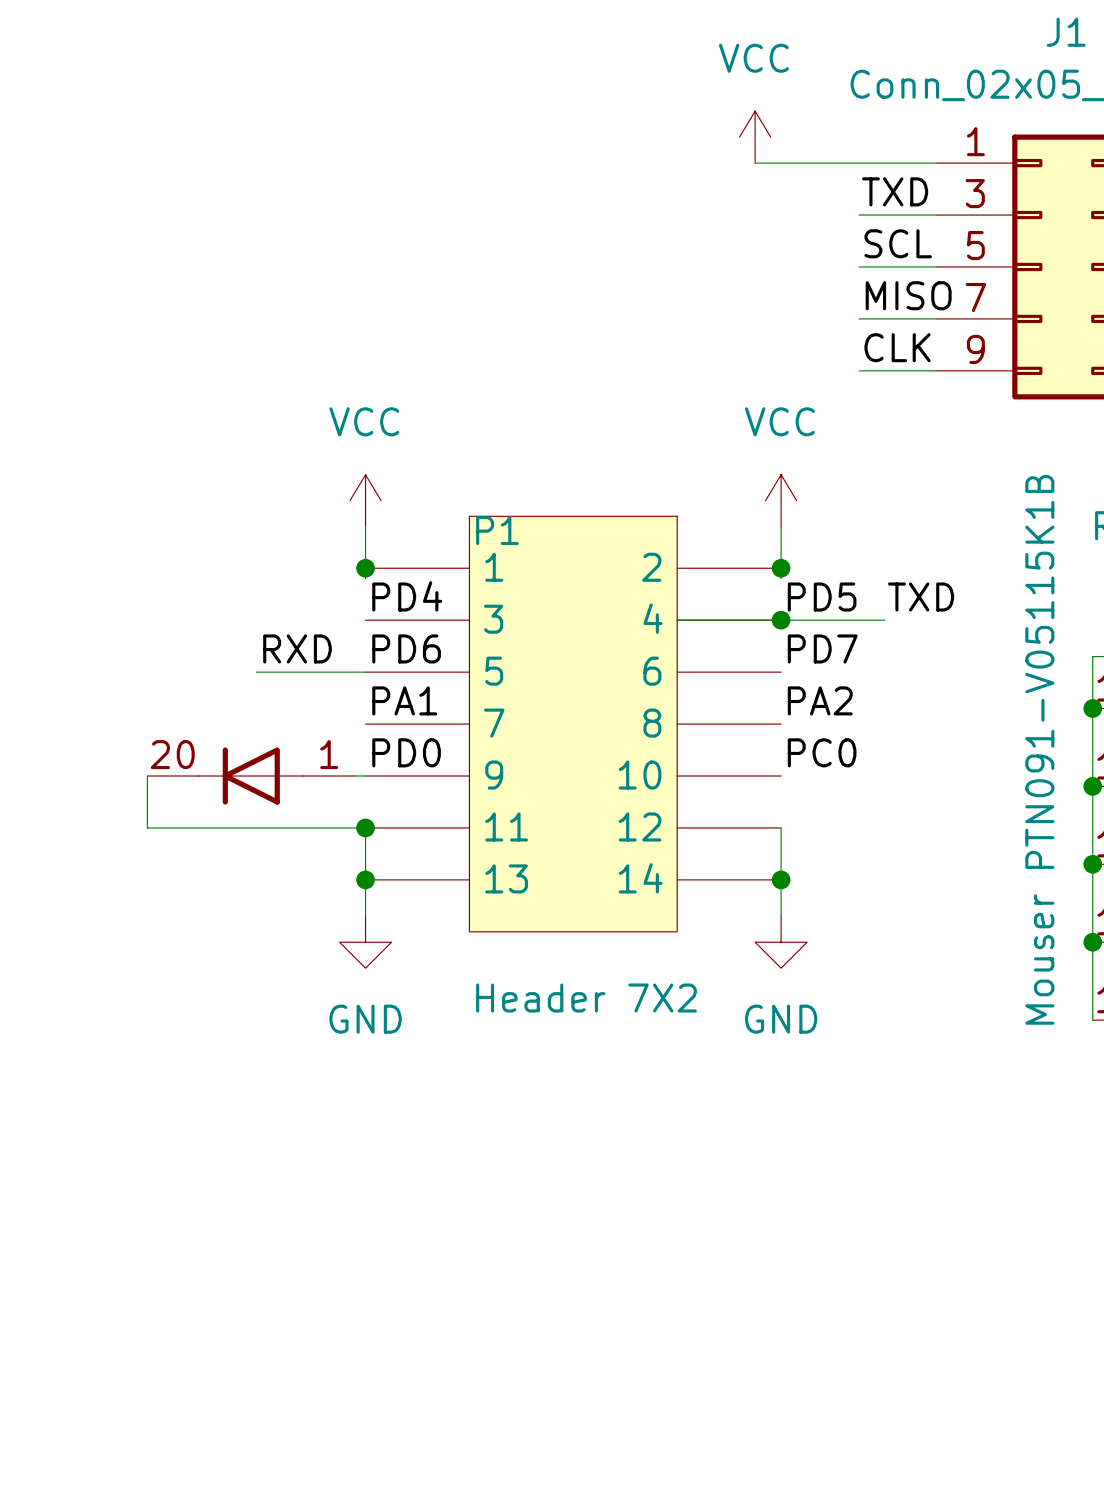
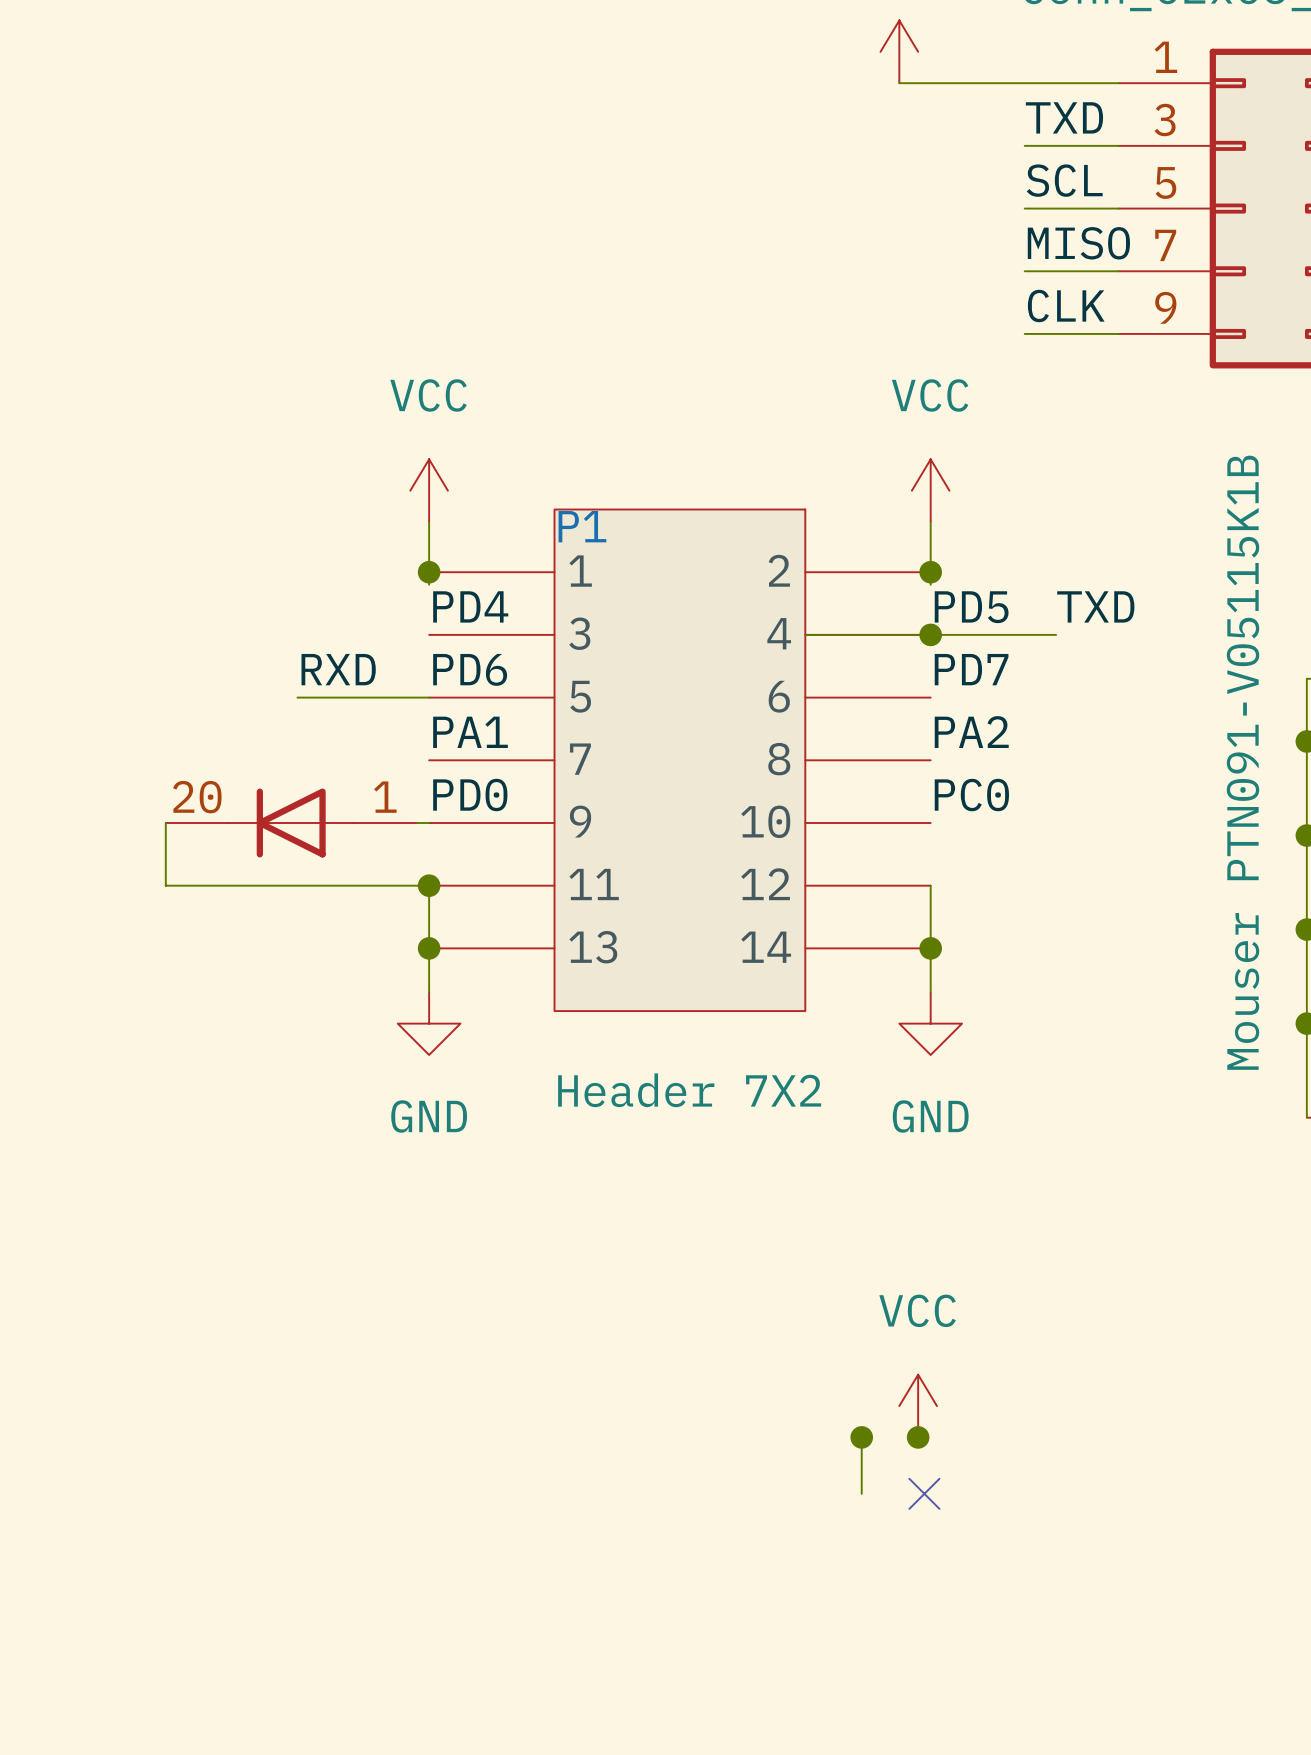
power symbol: none -> VCC (918, 1406)
wire: none -> (861, 1437) (861, 1493)
junction: none -> (861, 1437)
junction: none -> (918, 1437)
no-connect mark: none -> (924, 1493)

